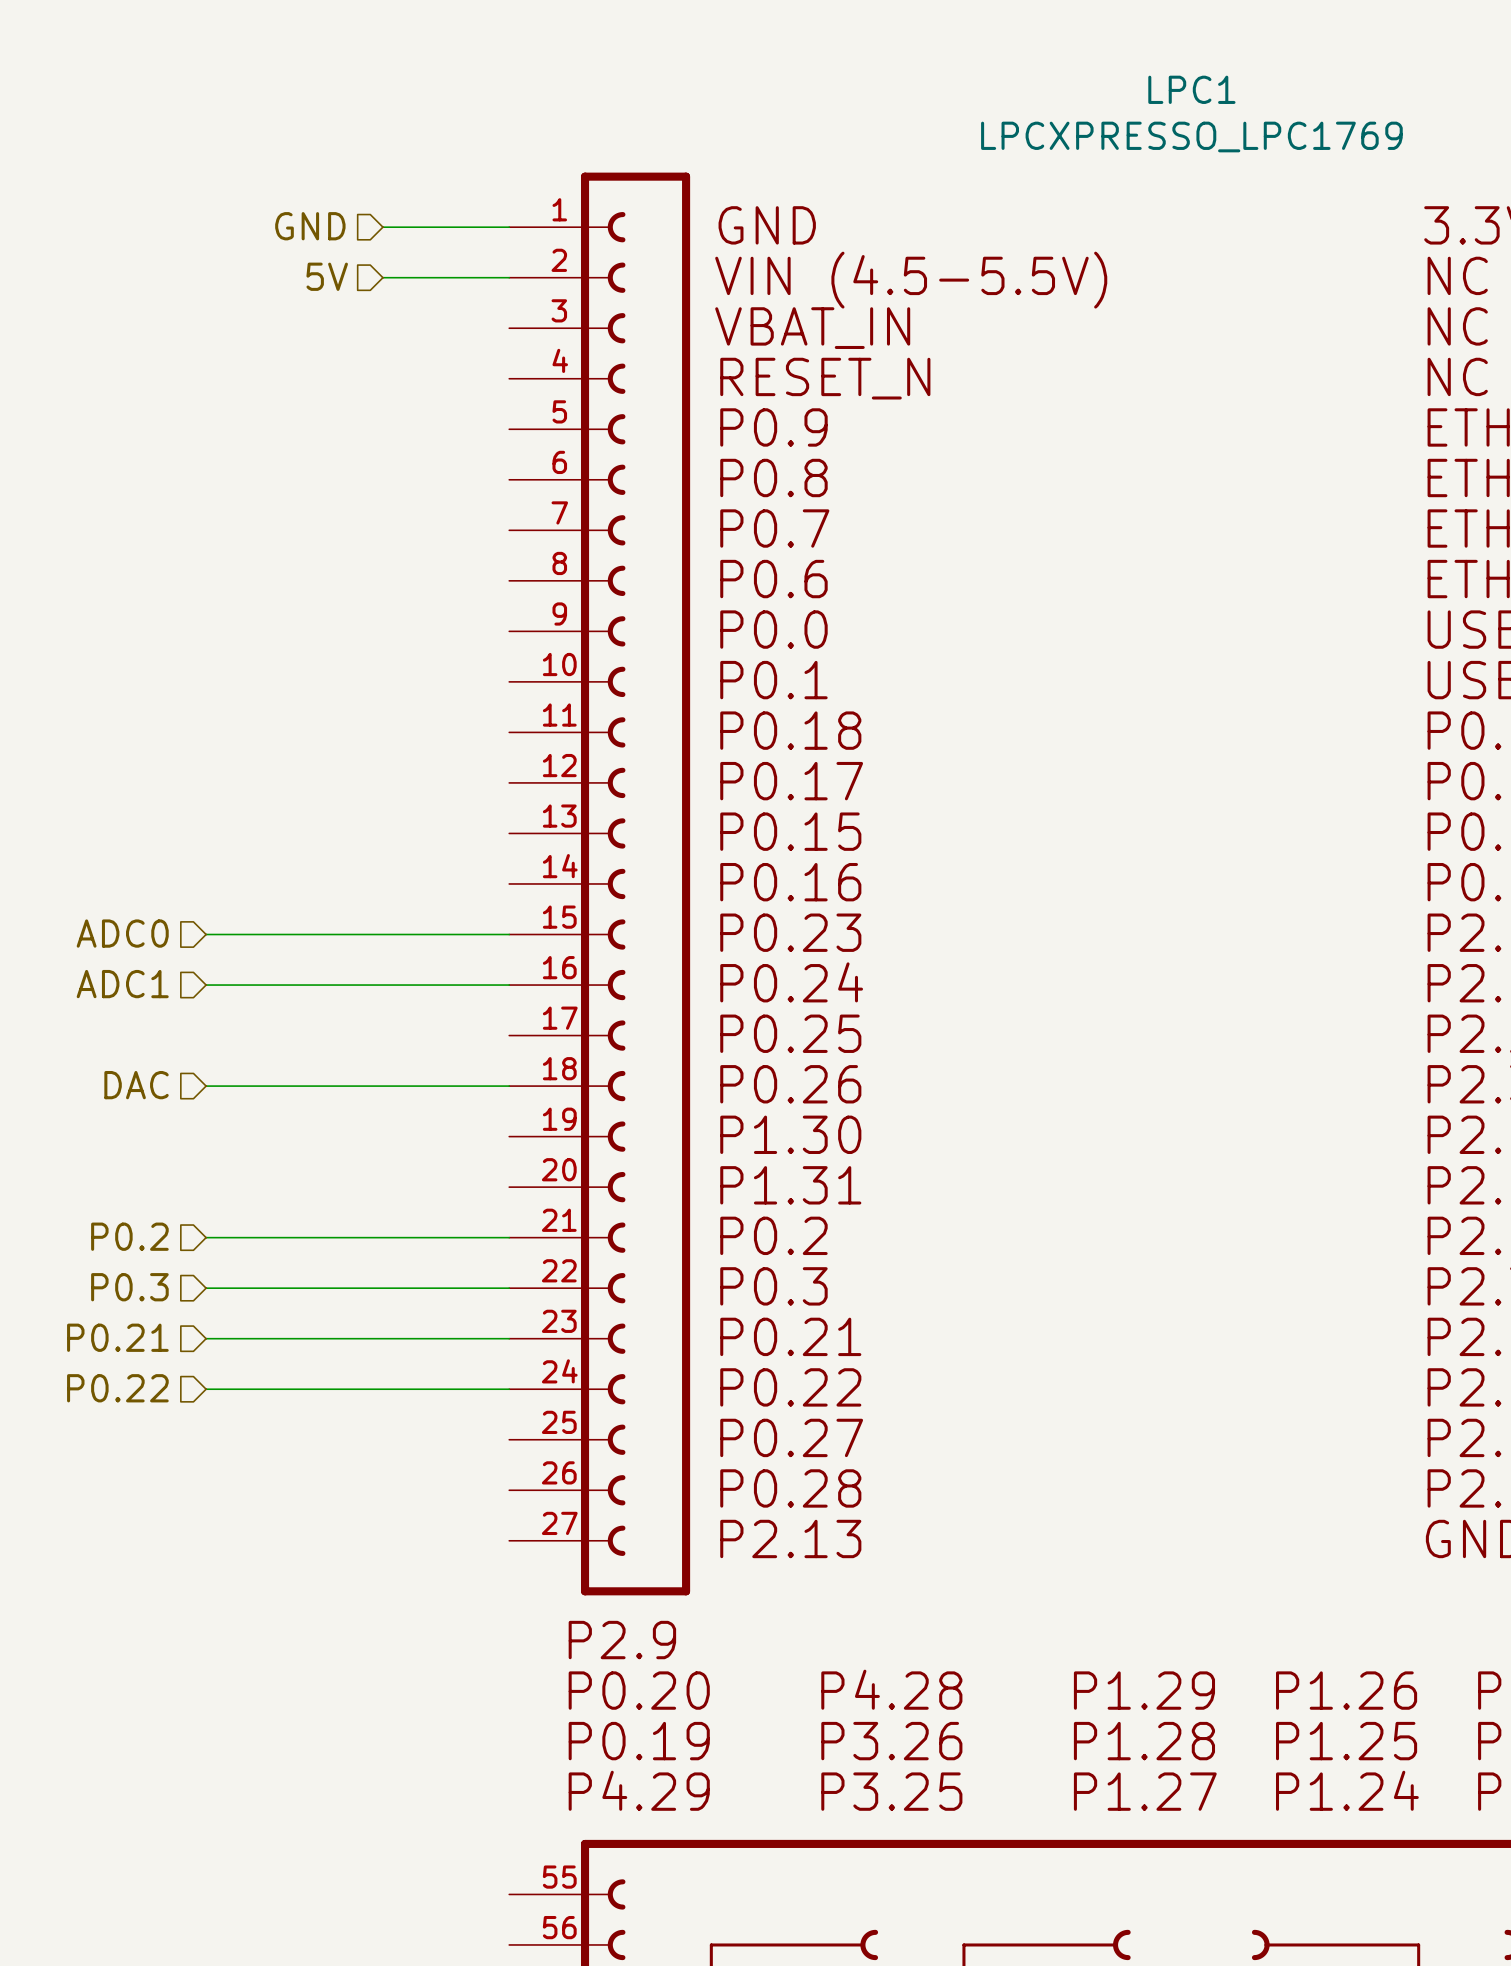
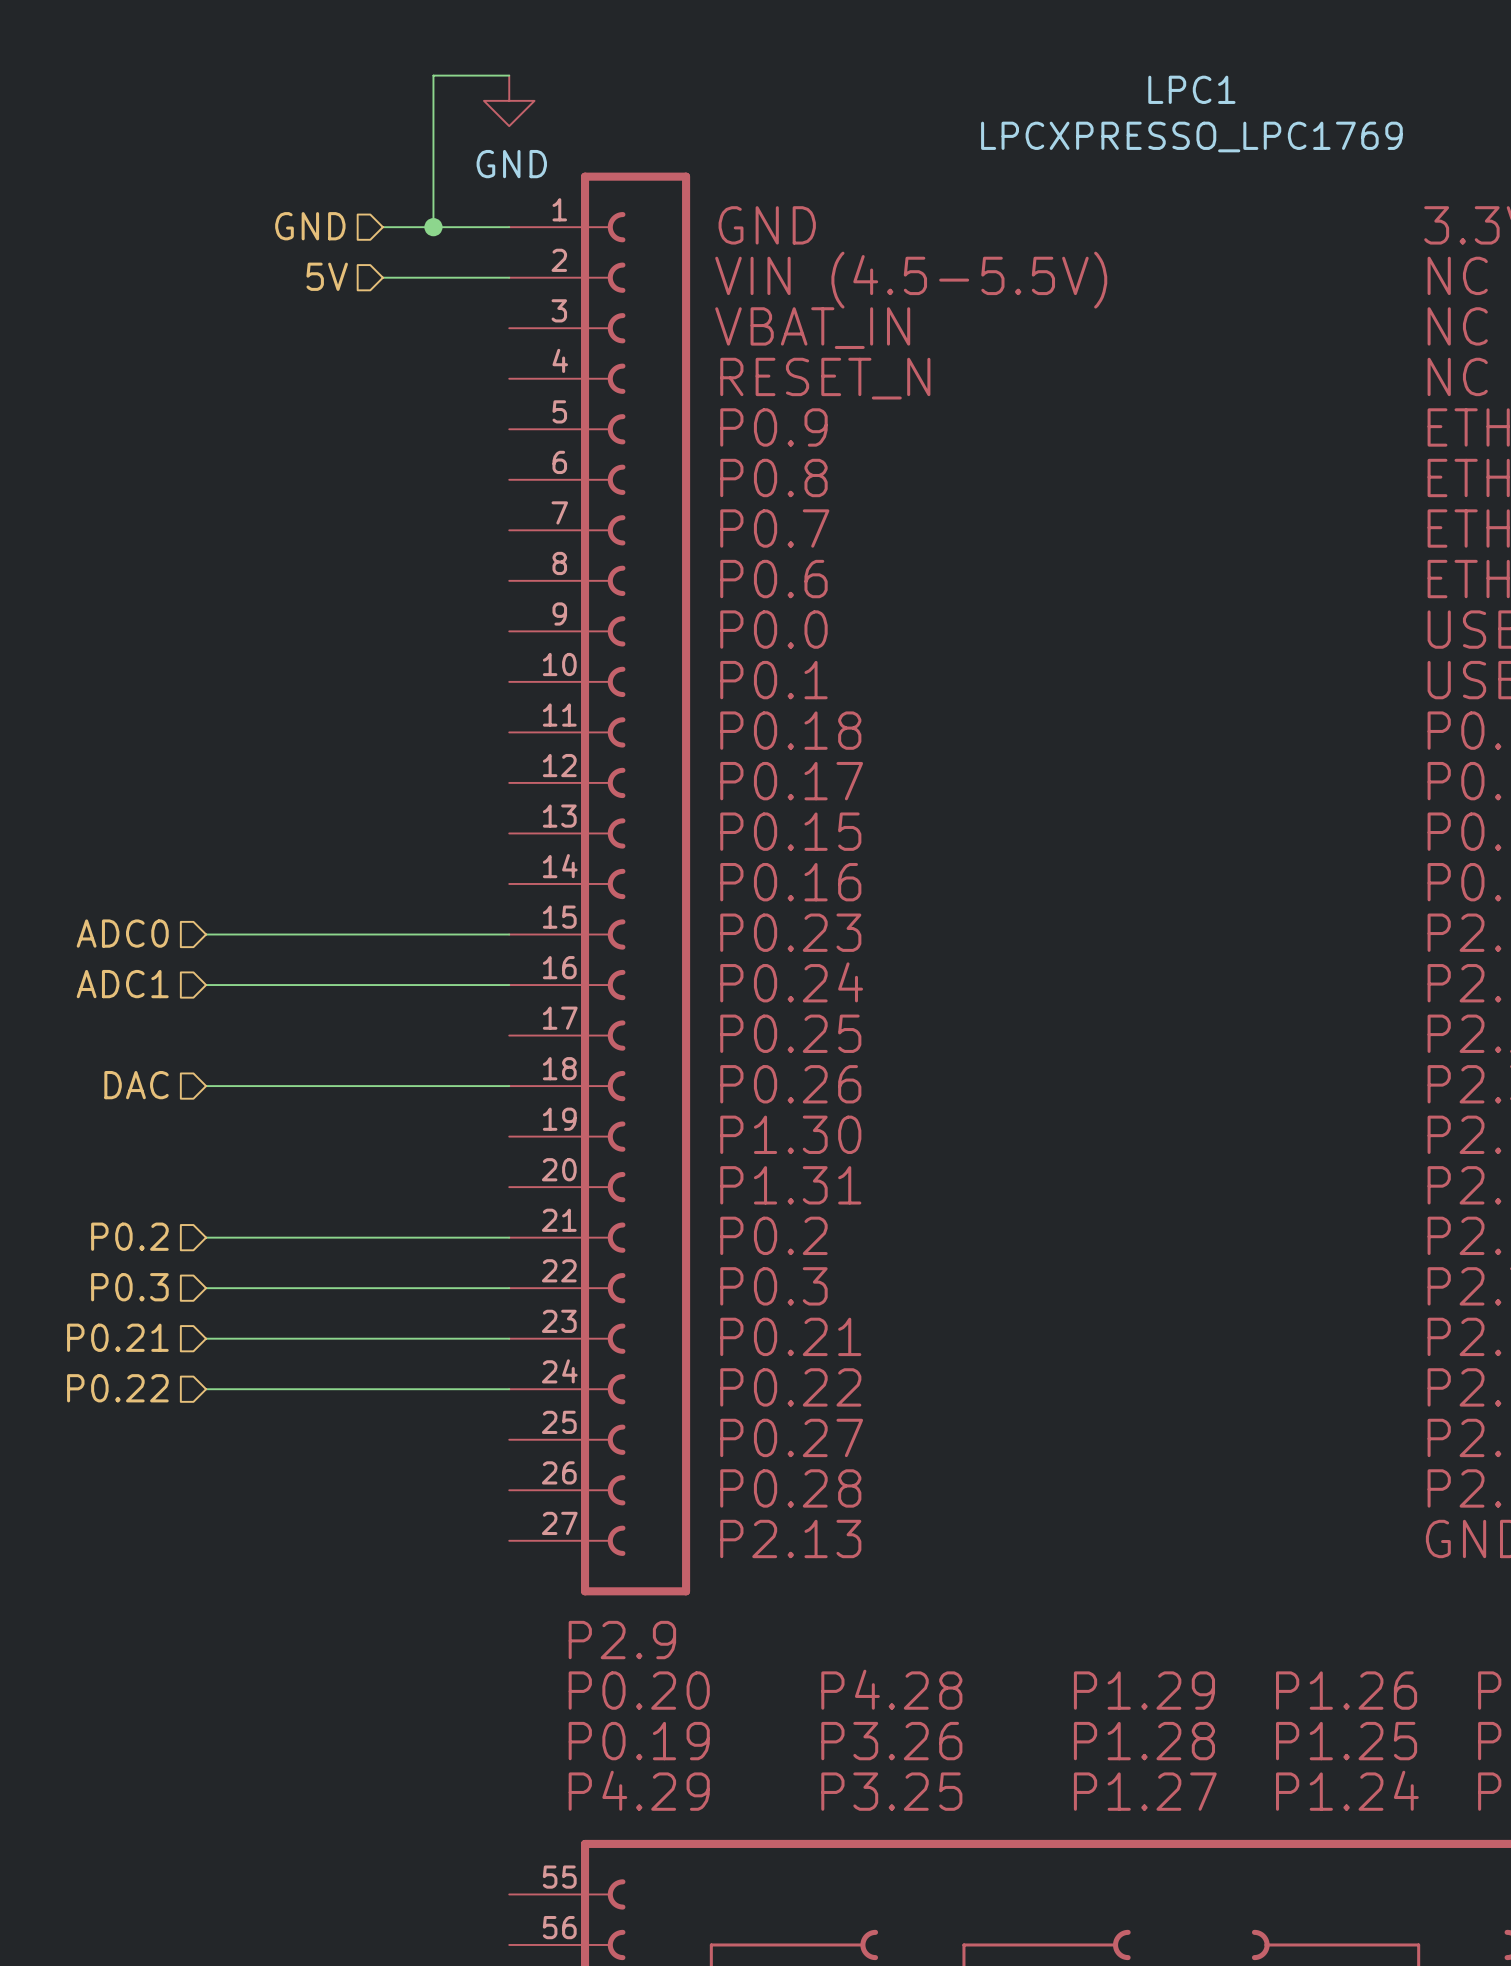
wire: none -> (509, 75) (433, 75) (433, 227)
power symbol: none -> GND (509, 100)
junction: none -> (433, 227)

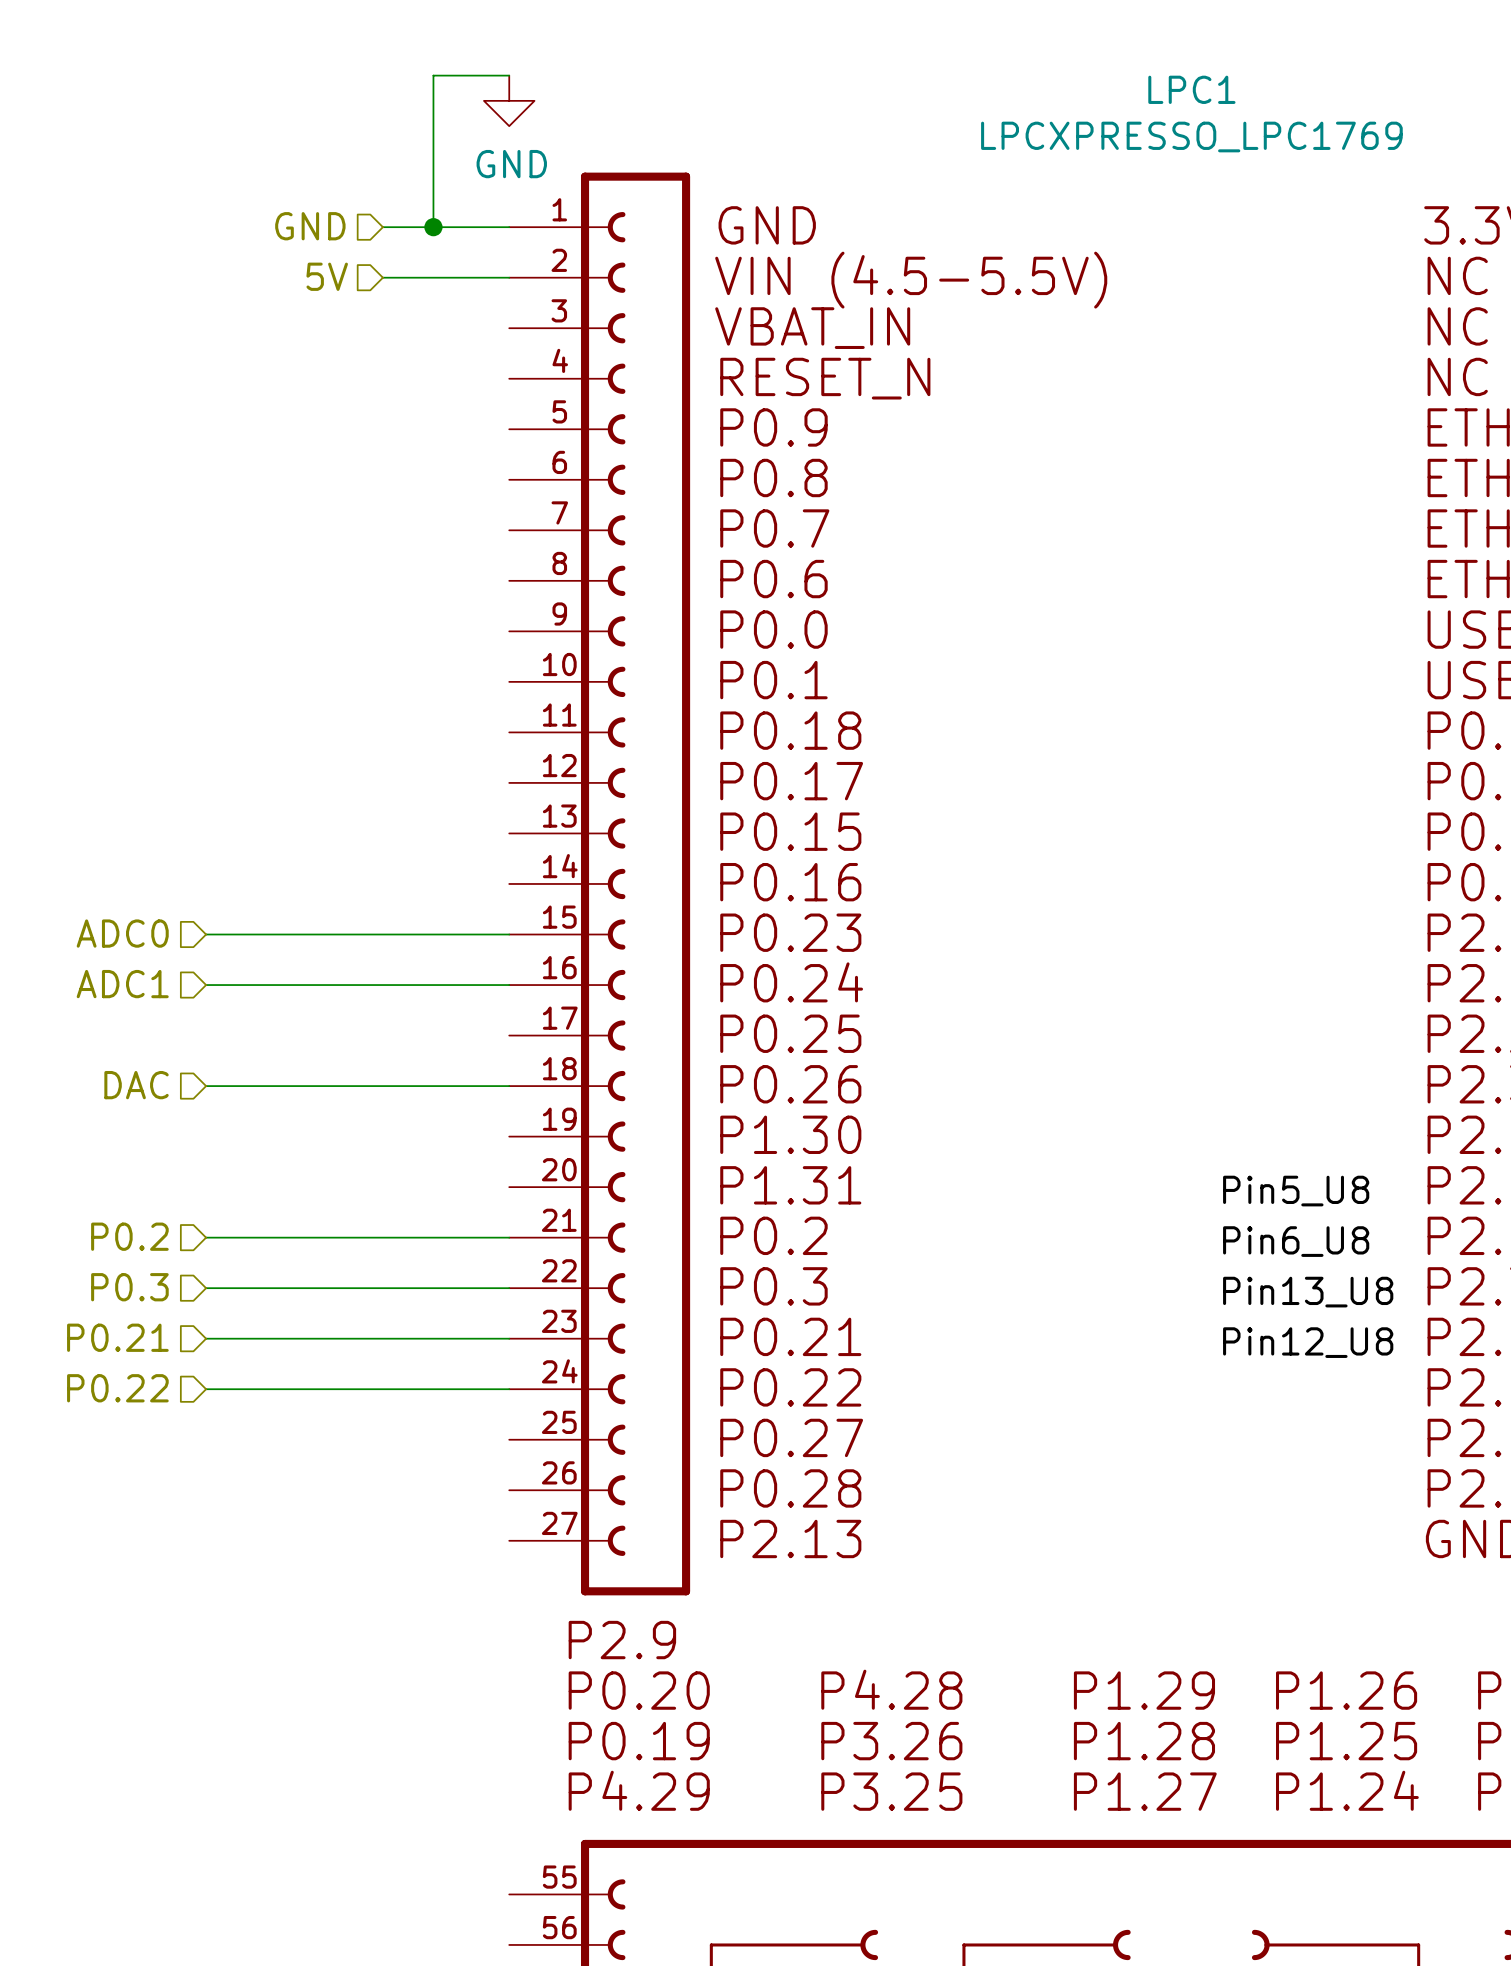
label: none -> Pin5_U8 (1296, 1191)
label: none -> Pin6_U8 (1296, 1241)
label: none -> Pin13_U8 (1308, 1292)
label: none -> Pin12_U8 (1308, 1342)

